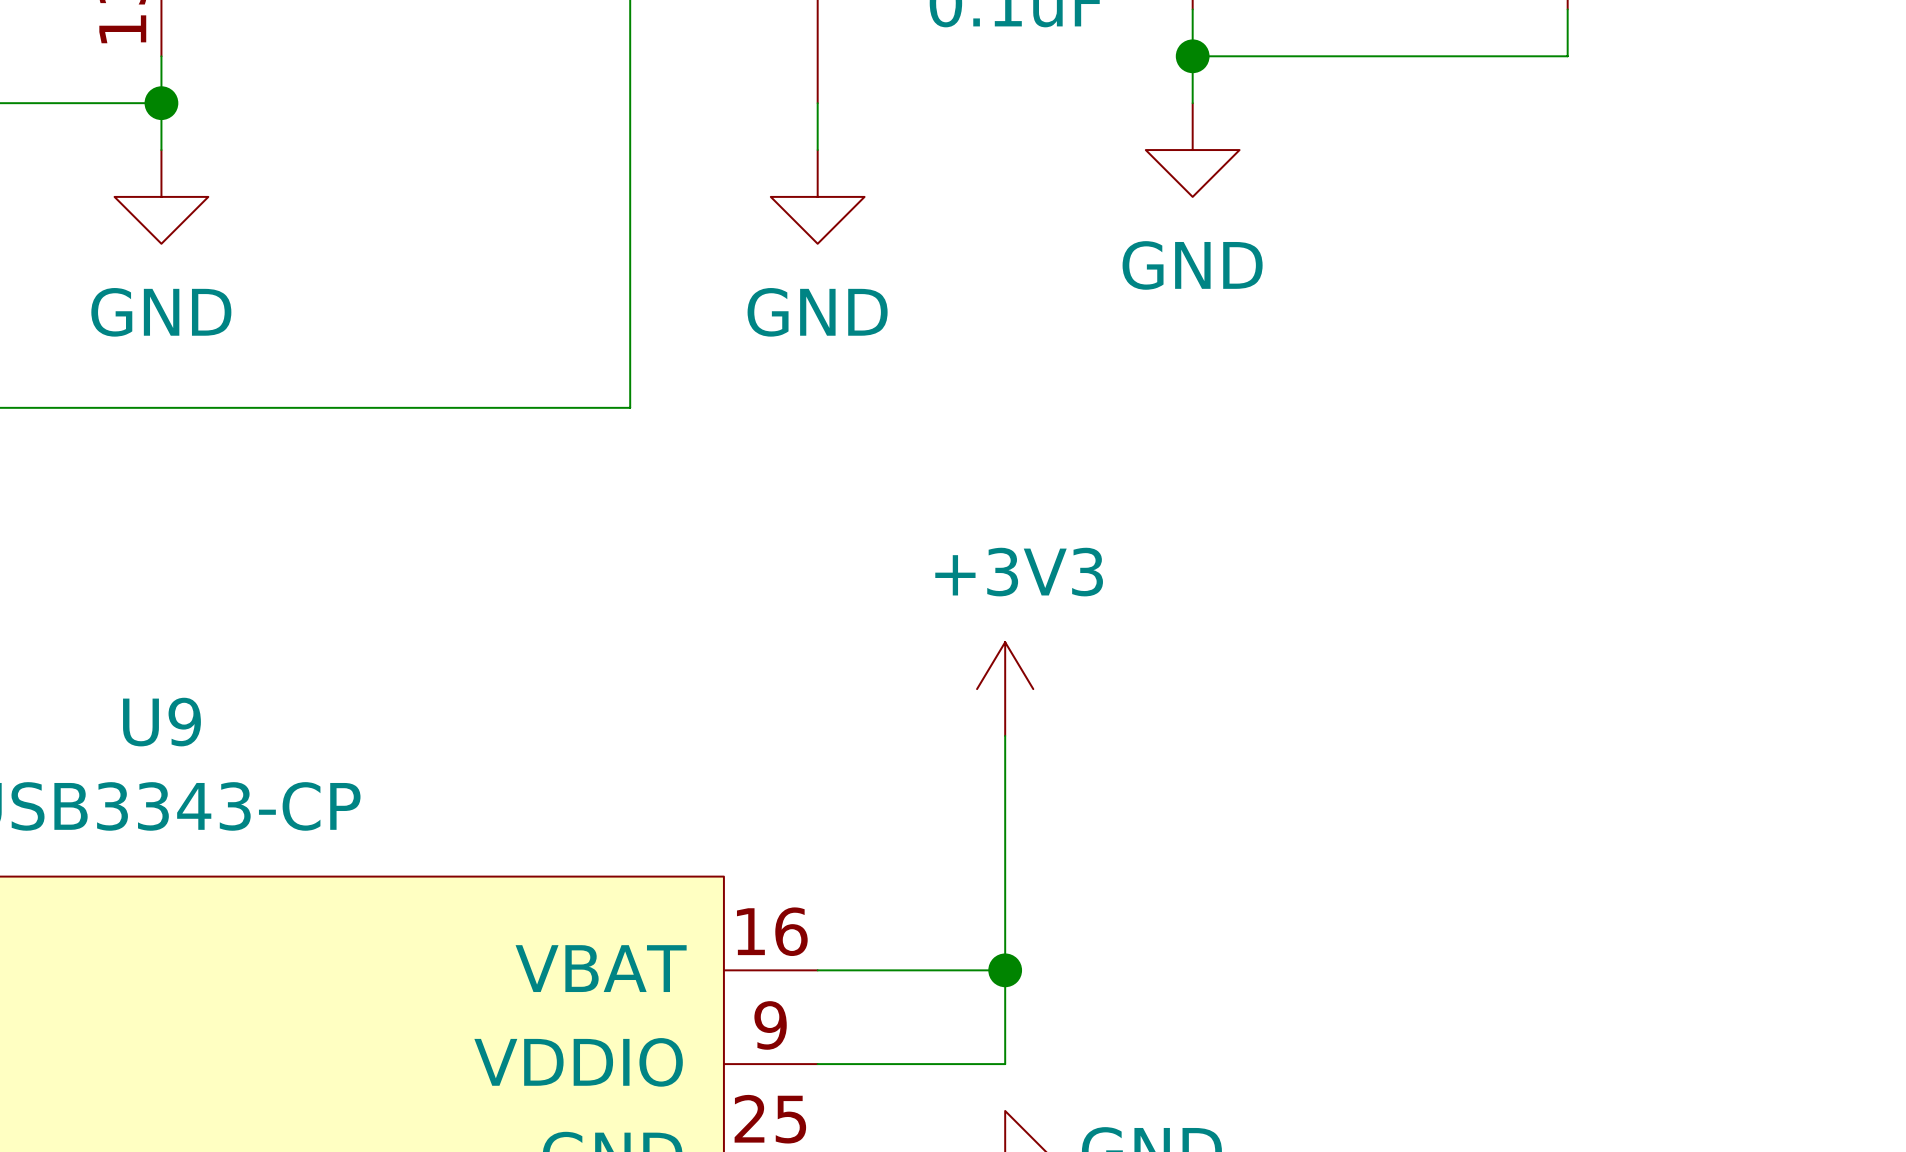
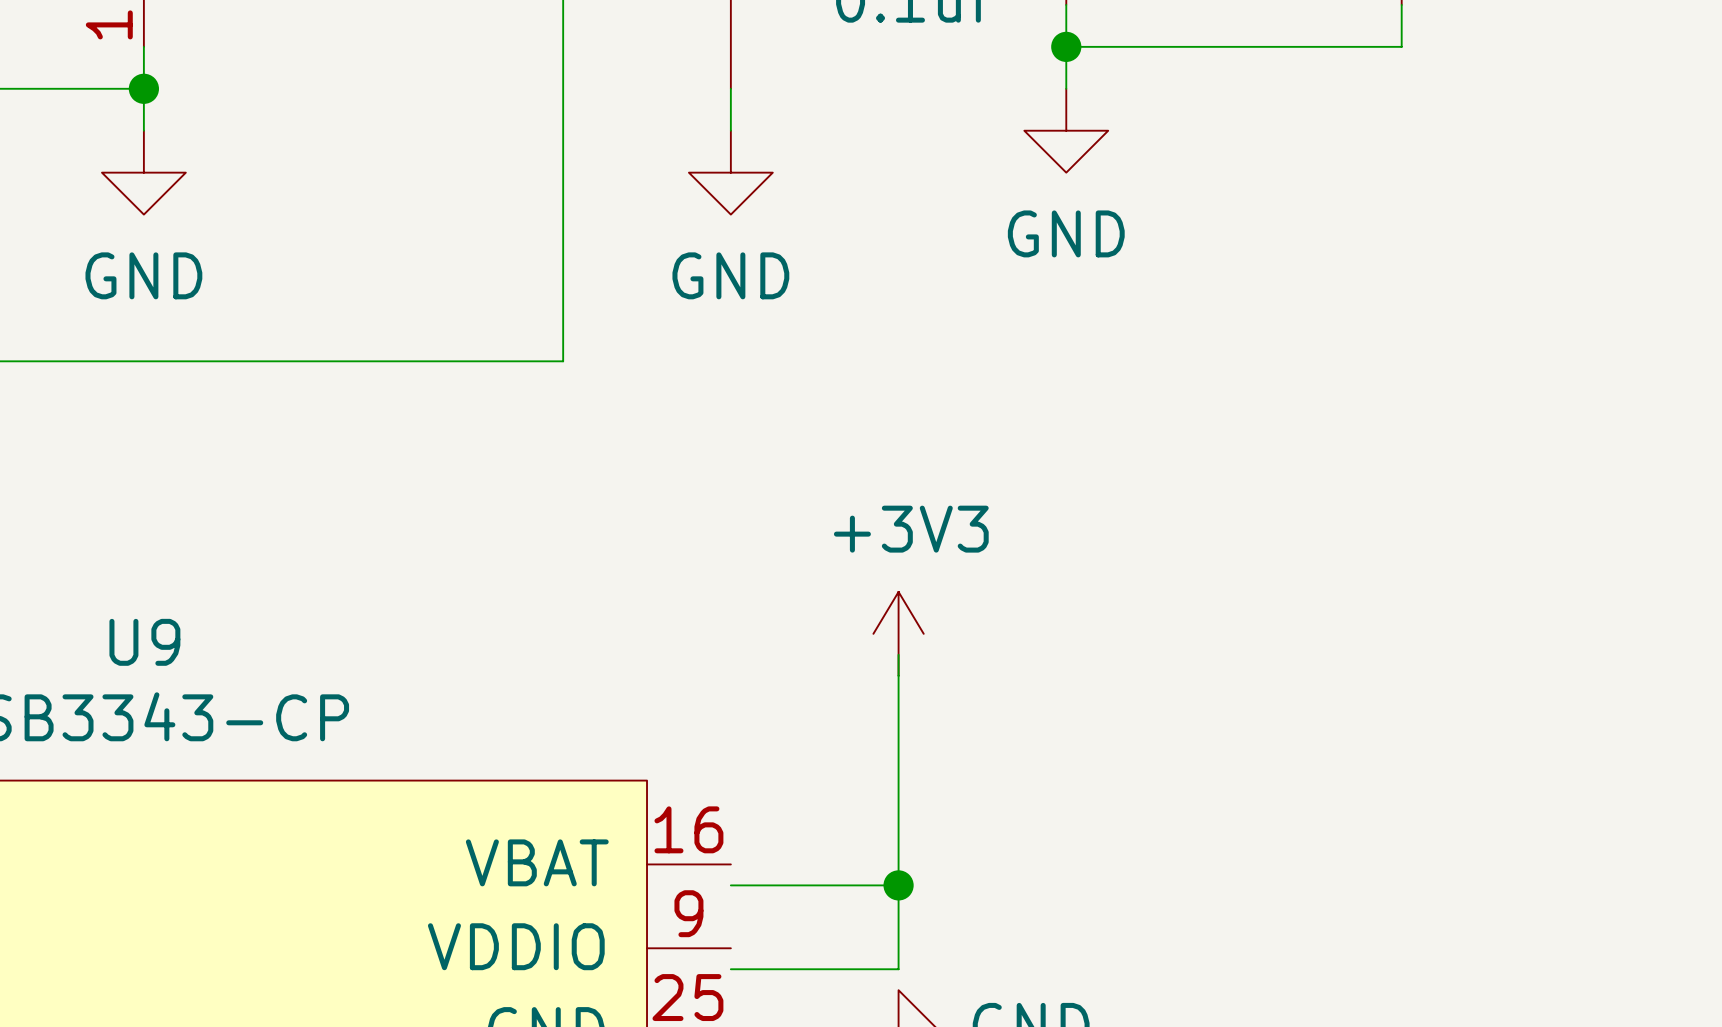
power symbol position: +3V3 (1005, 689) -> +3V3 (898, 633)
wire: (817, 970) (1005, 970) -> (730, 885) (898, 885)
junction position: (1005, 970) -> (898, 885)
wire: (817, 1064) (1005, 1064) -> (730, 969) (898, 969) (898, 948)

